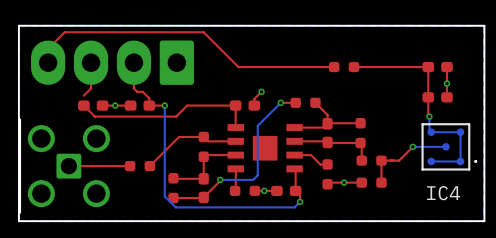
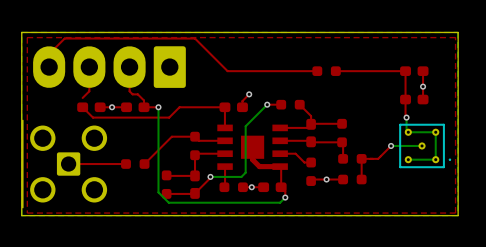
top zone outline: none -> (455, 37) (455, 213) (27, 213) (27, 37) (455, 37)
IC4: (449, 146) -> none
part: none -> (425, 145)
top track: none -> (252, 147) (252, 159) (259, 166) (280, 166)

